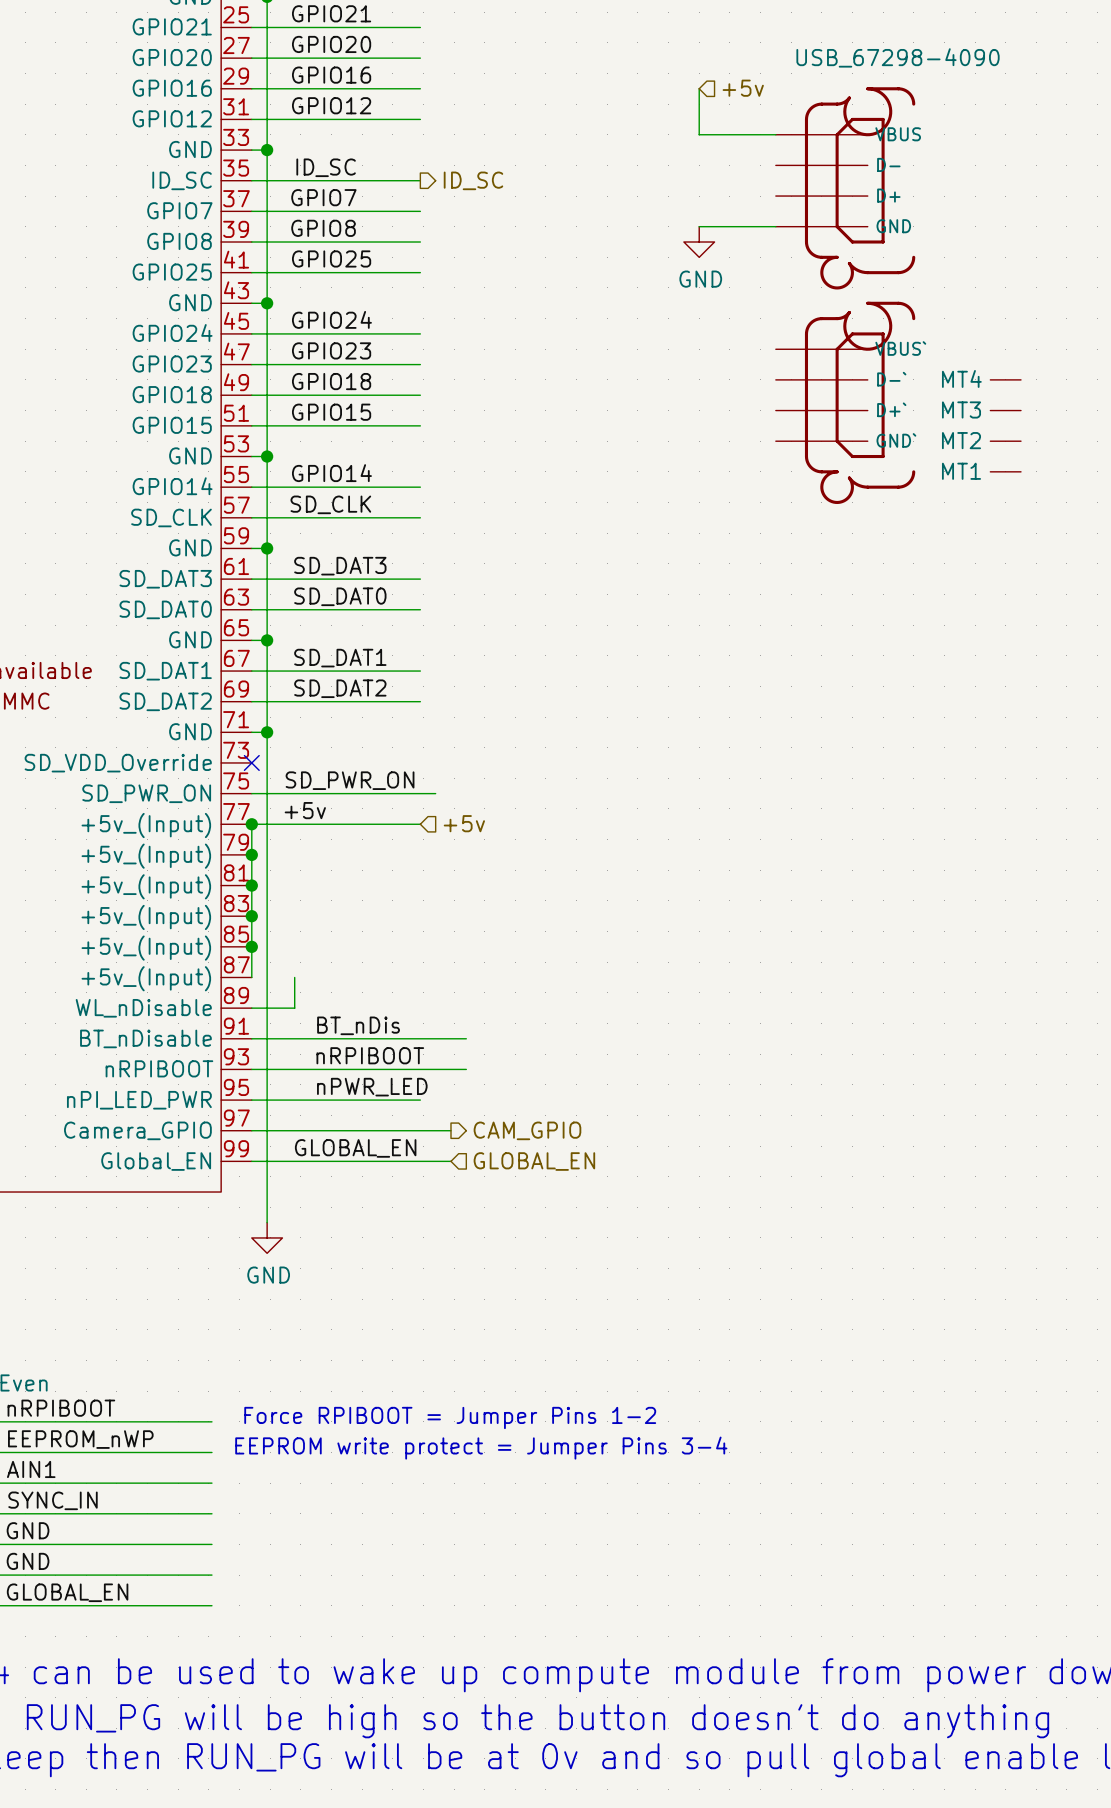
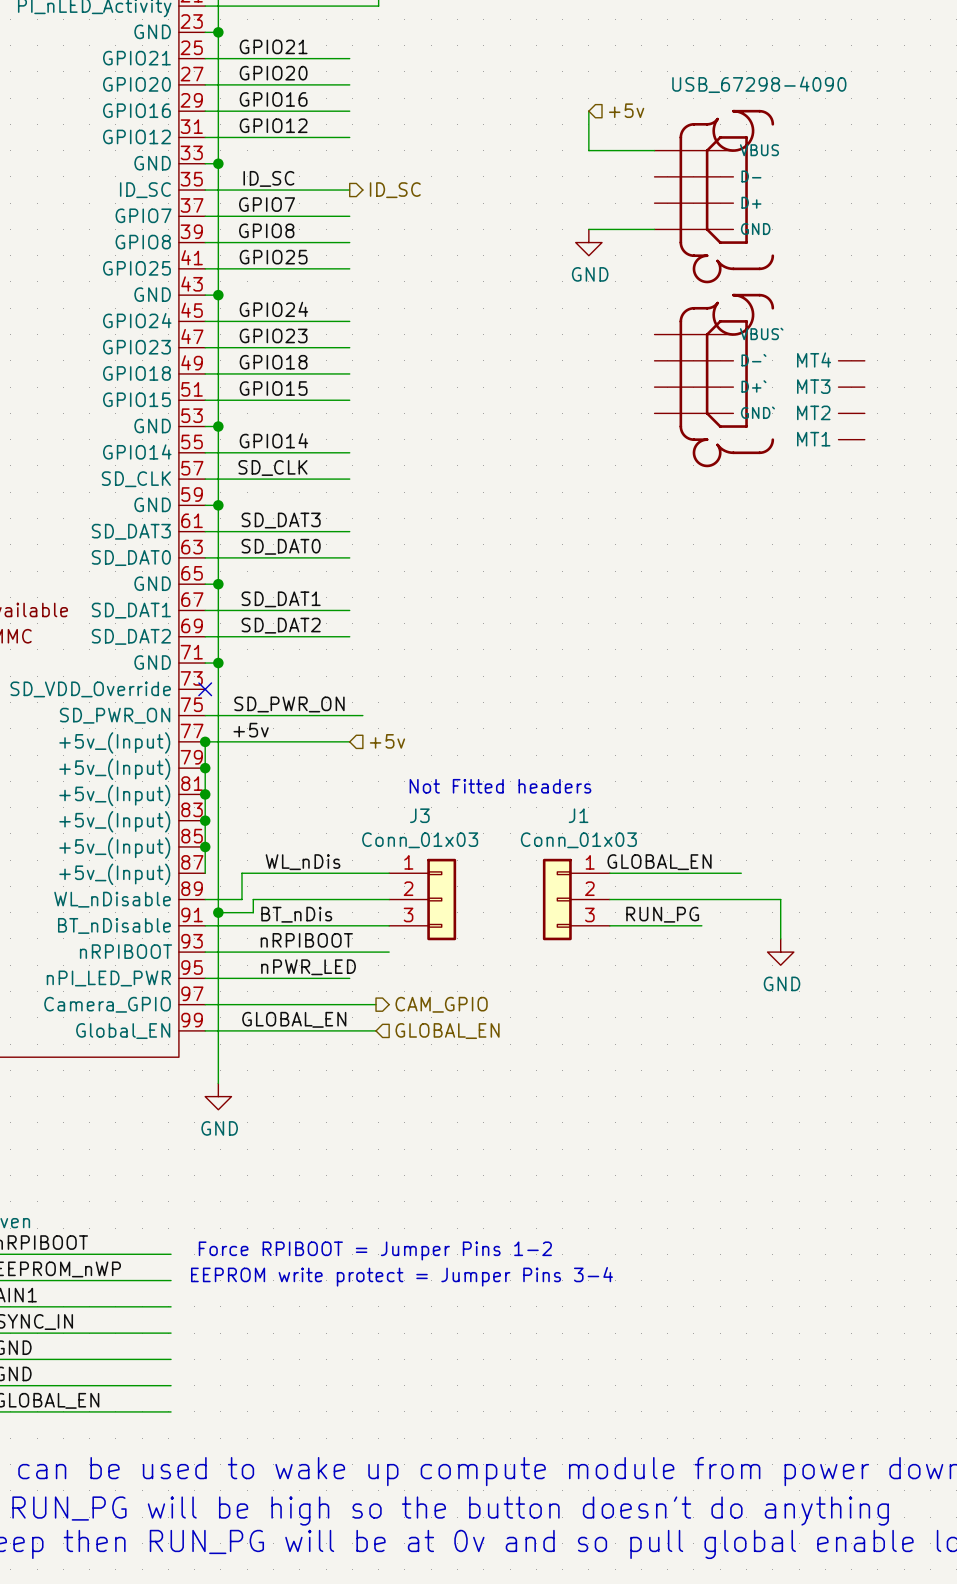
text: none -> Not Fitted headers (500, 786)
label: none -> WL_nDis (303, 862)
label: none -> GLOBAL_EN (659, 862)
wire: none -> (241, 873) (389, 873)
wire: none -> (609, 873) (741, 873)
wire: none -> (389, 899) (253, 899) (253, 912) (218, 912)
J3: none -> Conn_01x03 (422, 899)
J1: none -> Conn_01x03 (576, 899)
wire: none -> (609, 899) (780, 899) (780, 938)
junction: none -> (218, 912)
label: none -> RUN_PG (662, 914)
wire: none -> (609, 925) (701, 925)
power symbol: none -> GND (780, 952)

